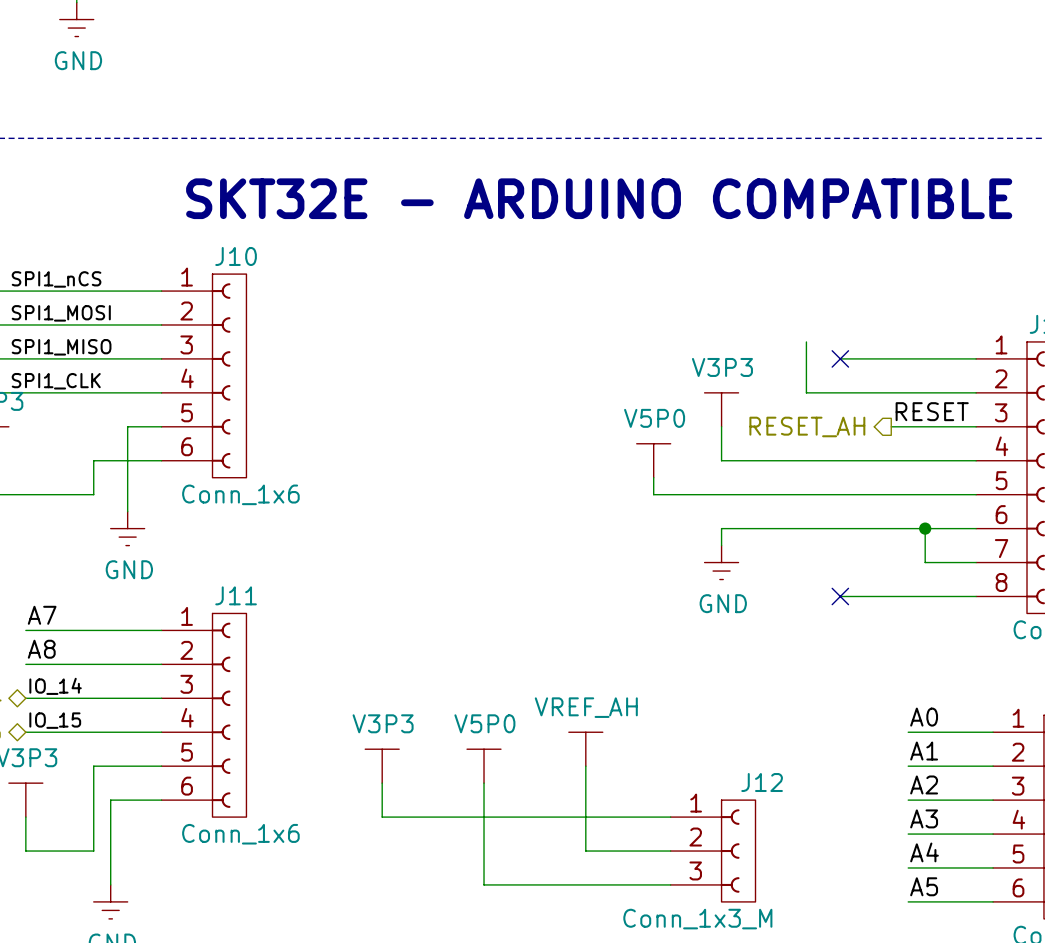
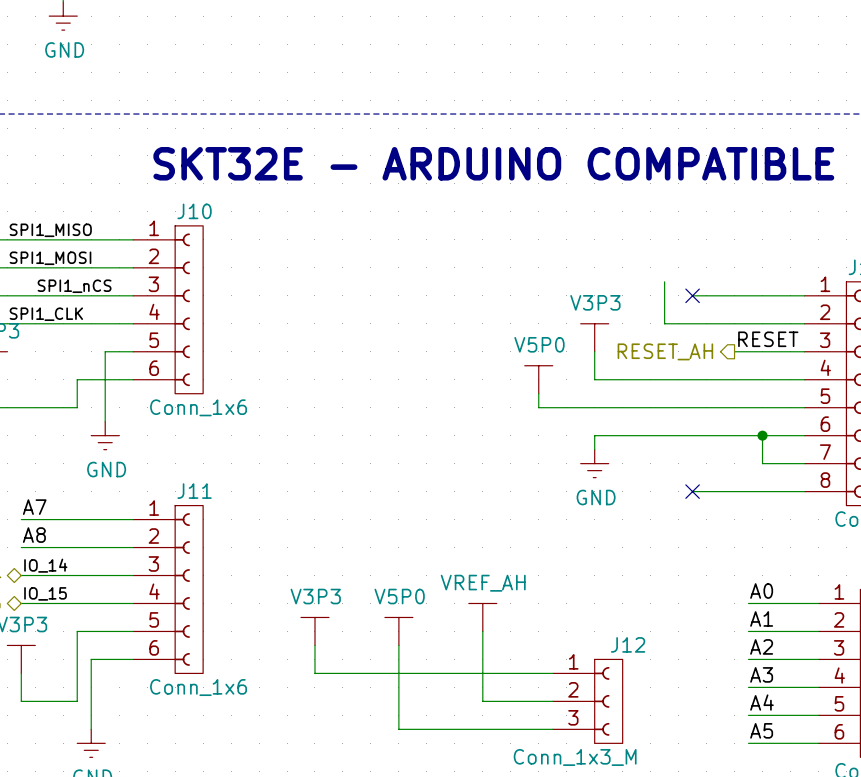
label: SPI1_nCS (56, 279) -> SPI1_MISO (50, 230)
label: SPI1_MISO (61, 347) -> SPI1_nCS (74, 286)

